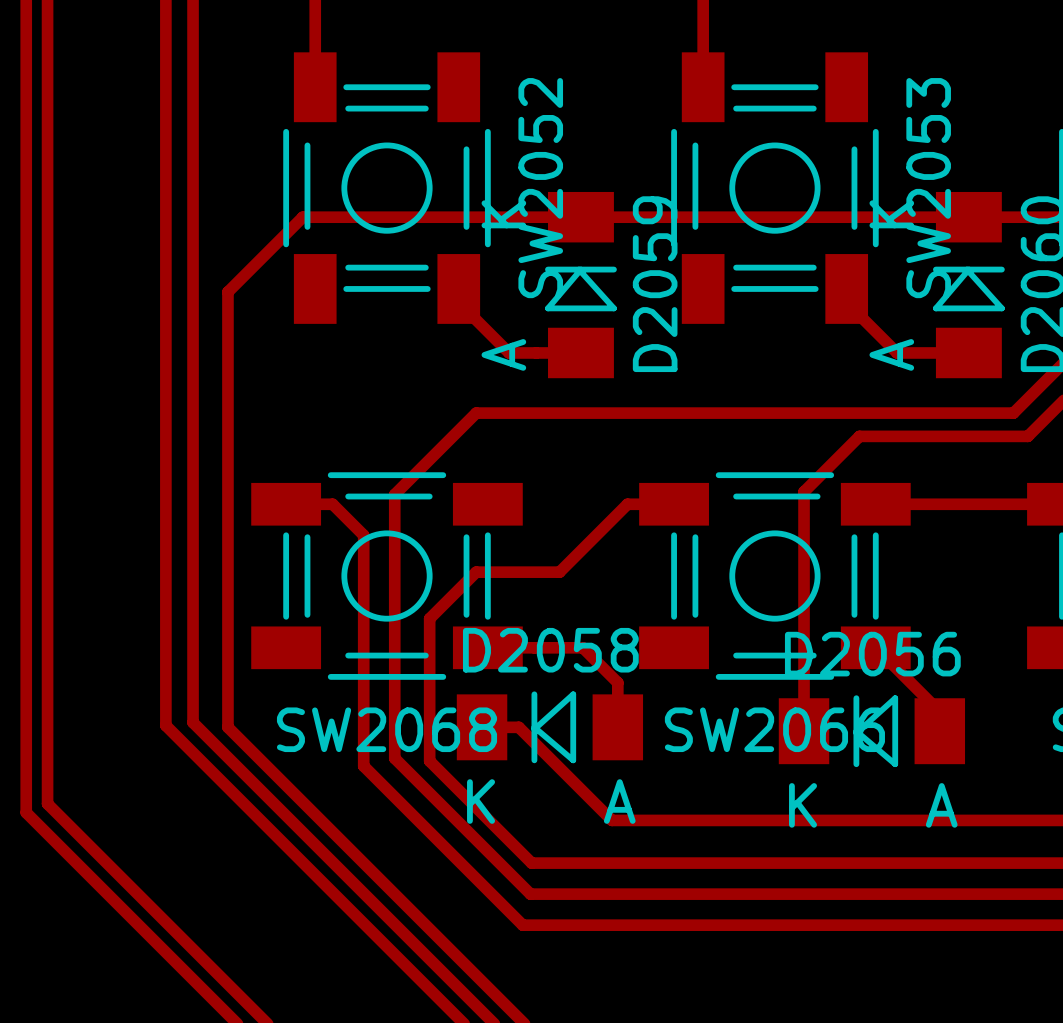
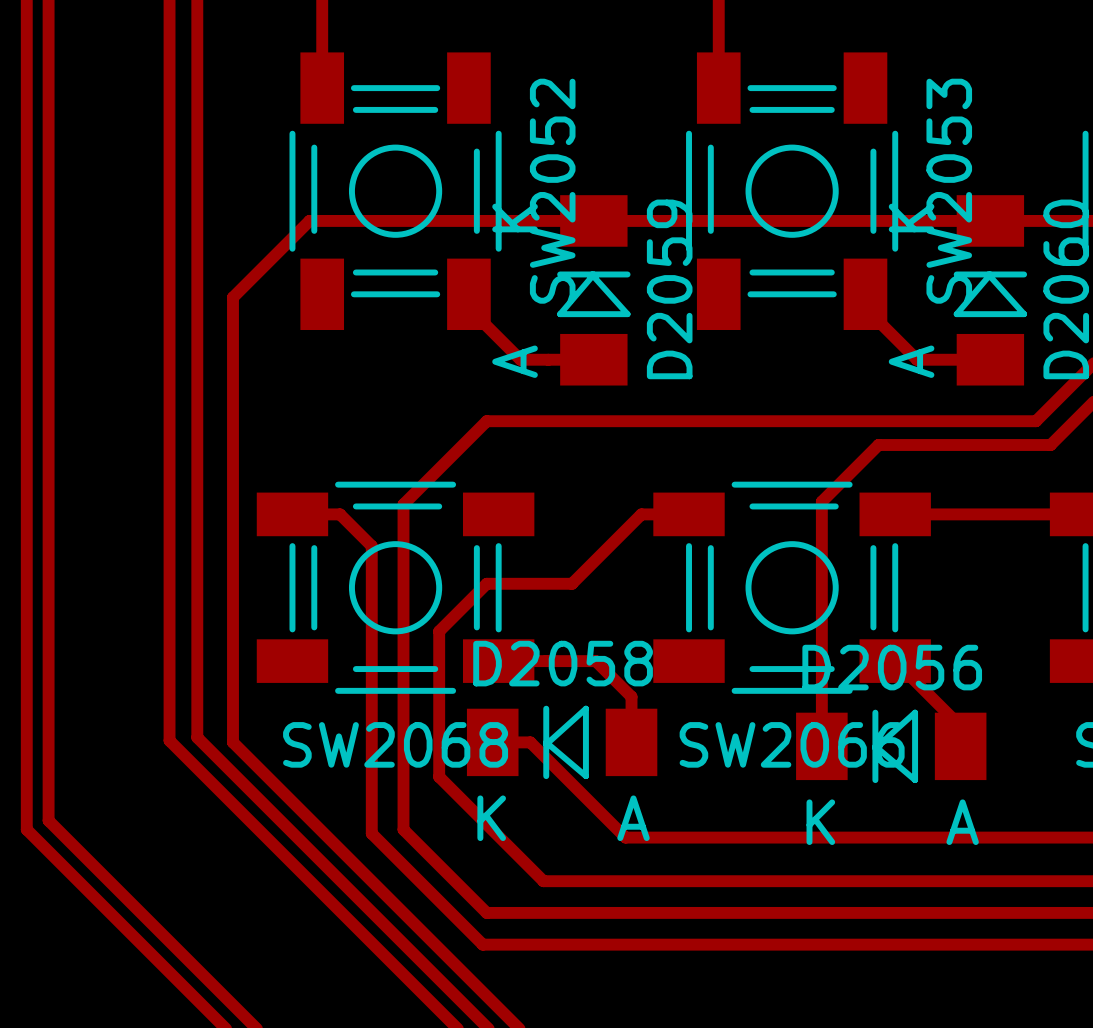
track: (394, 758) (530, 894) -> (403, 774) (403, 829) (486, 912) (542, 912)
track: (363, 766) (522, 925) -> (371, 782) (371, 833) (482, 944) (534, 944)

